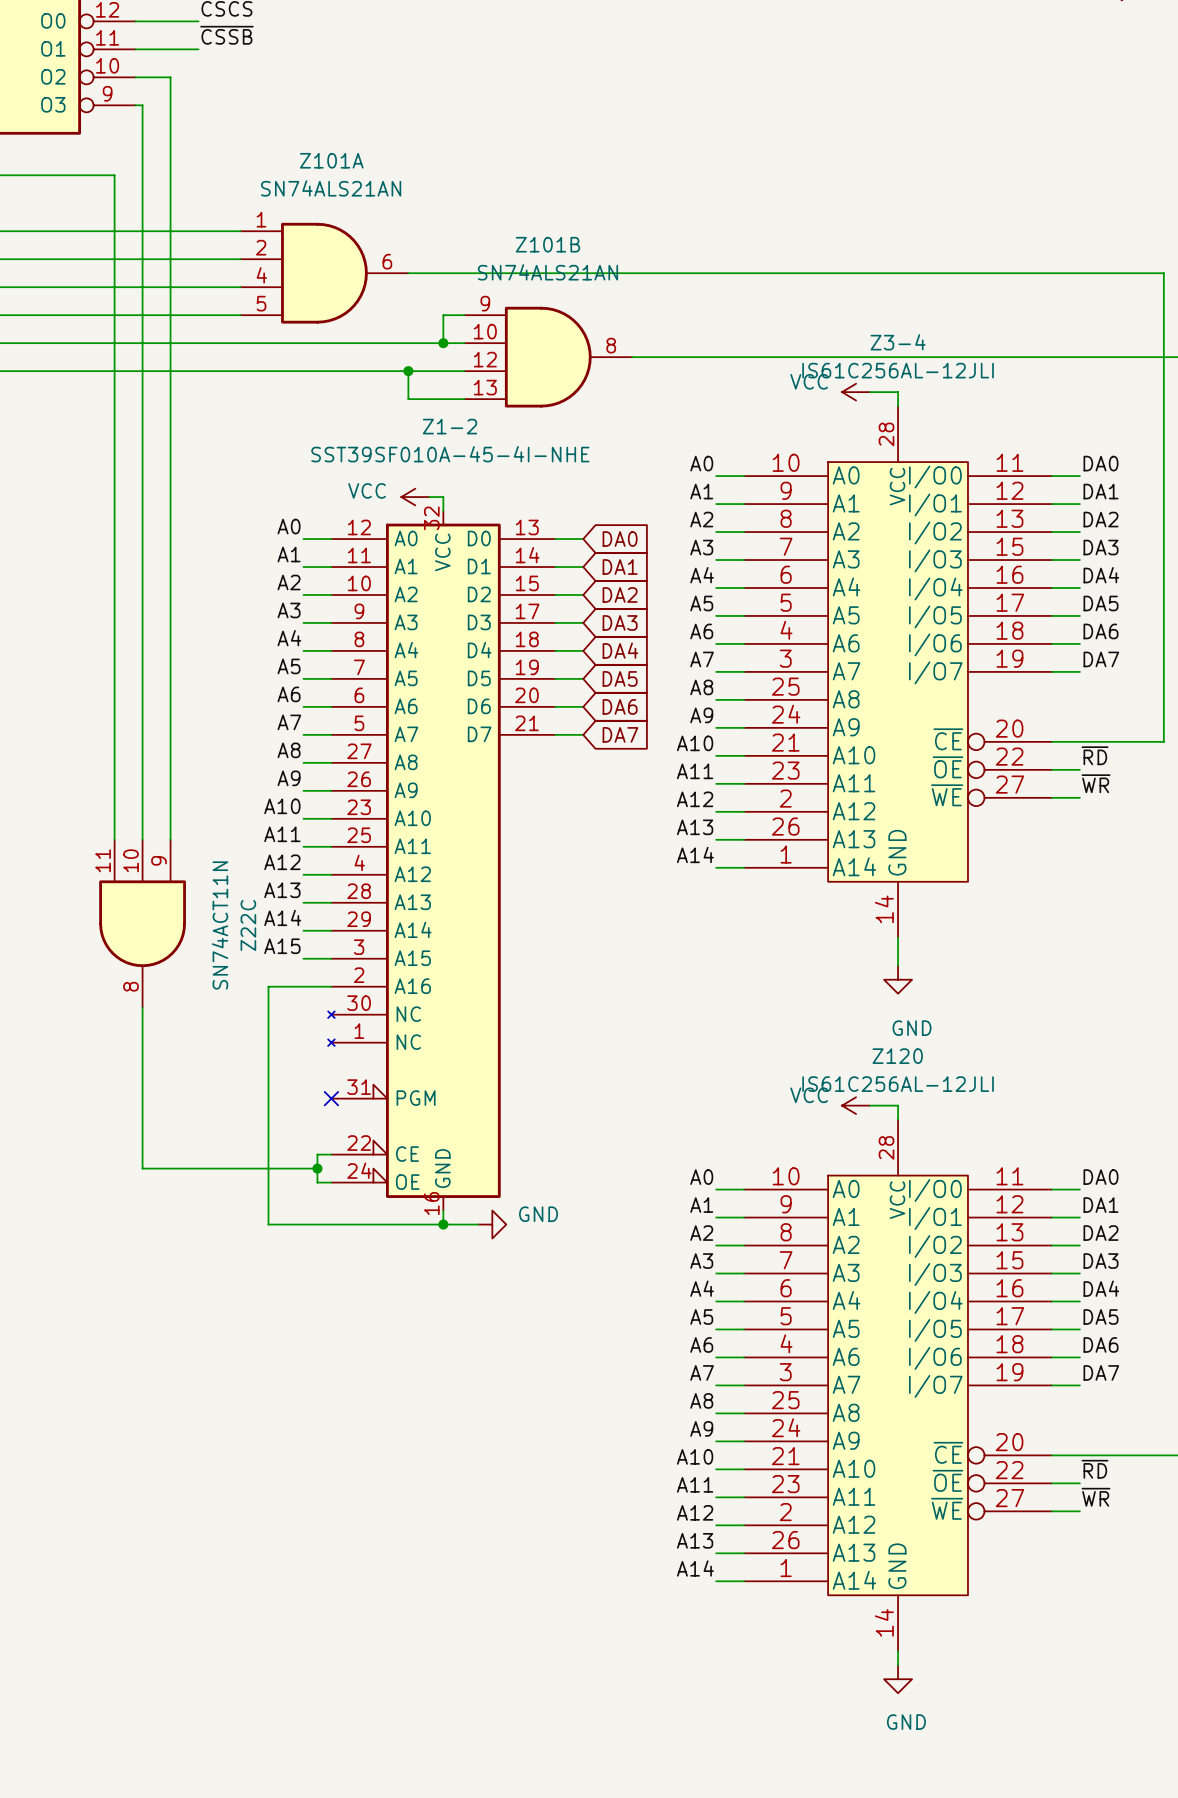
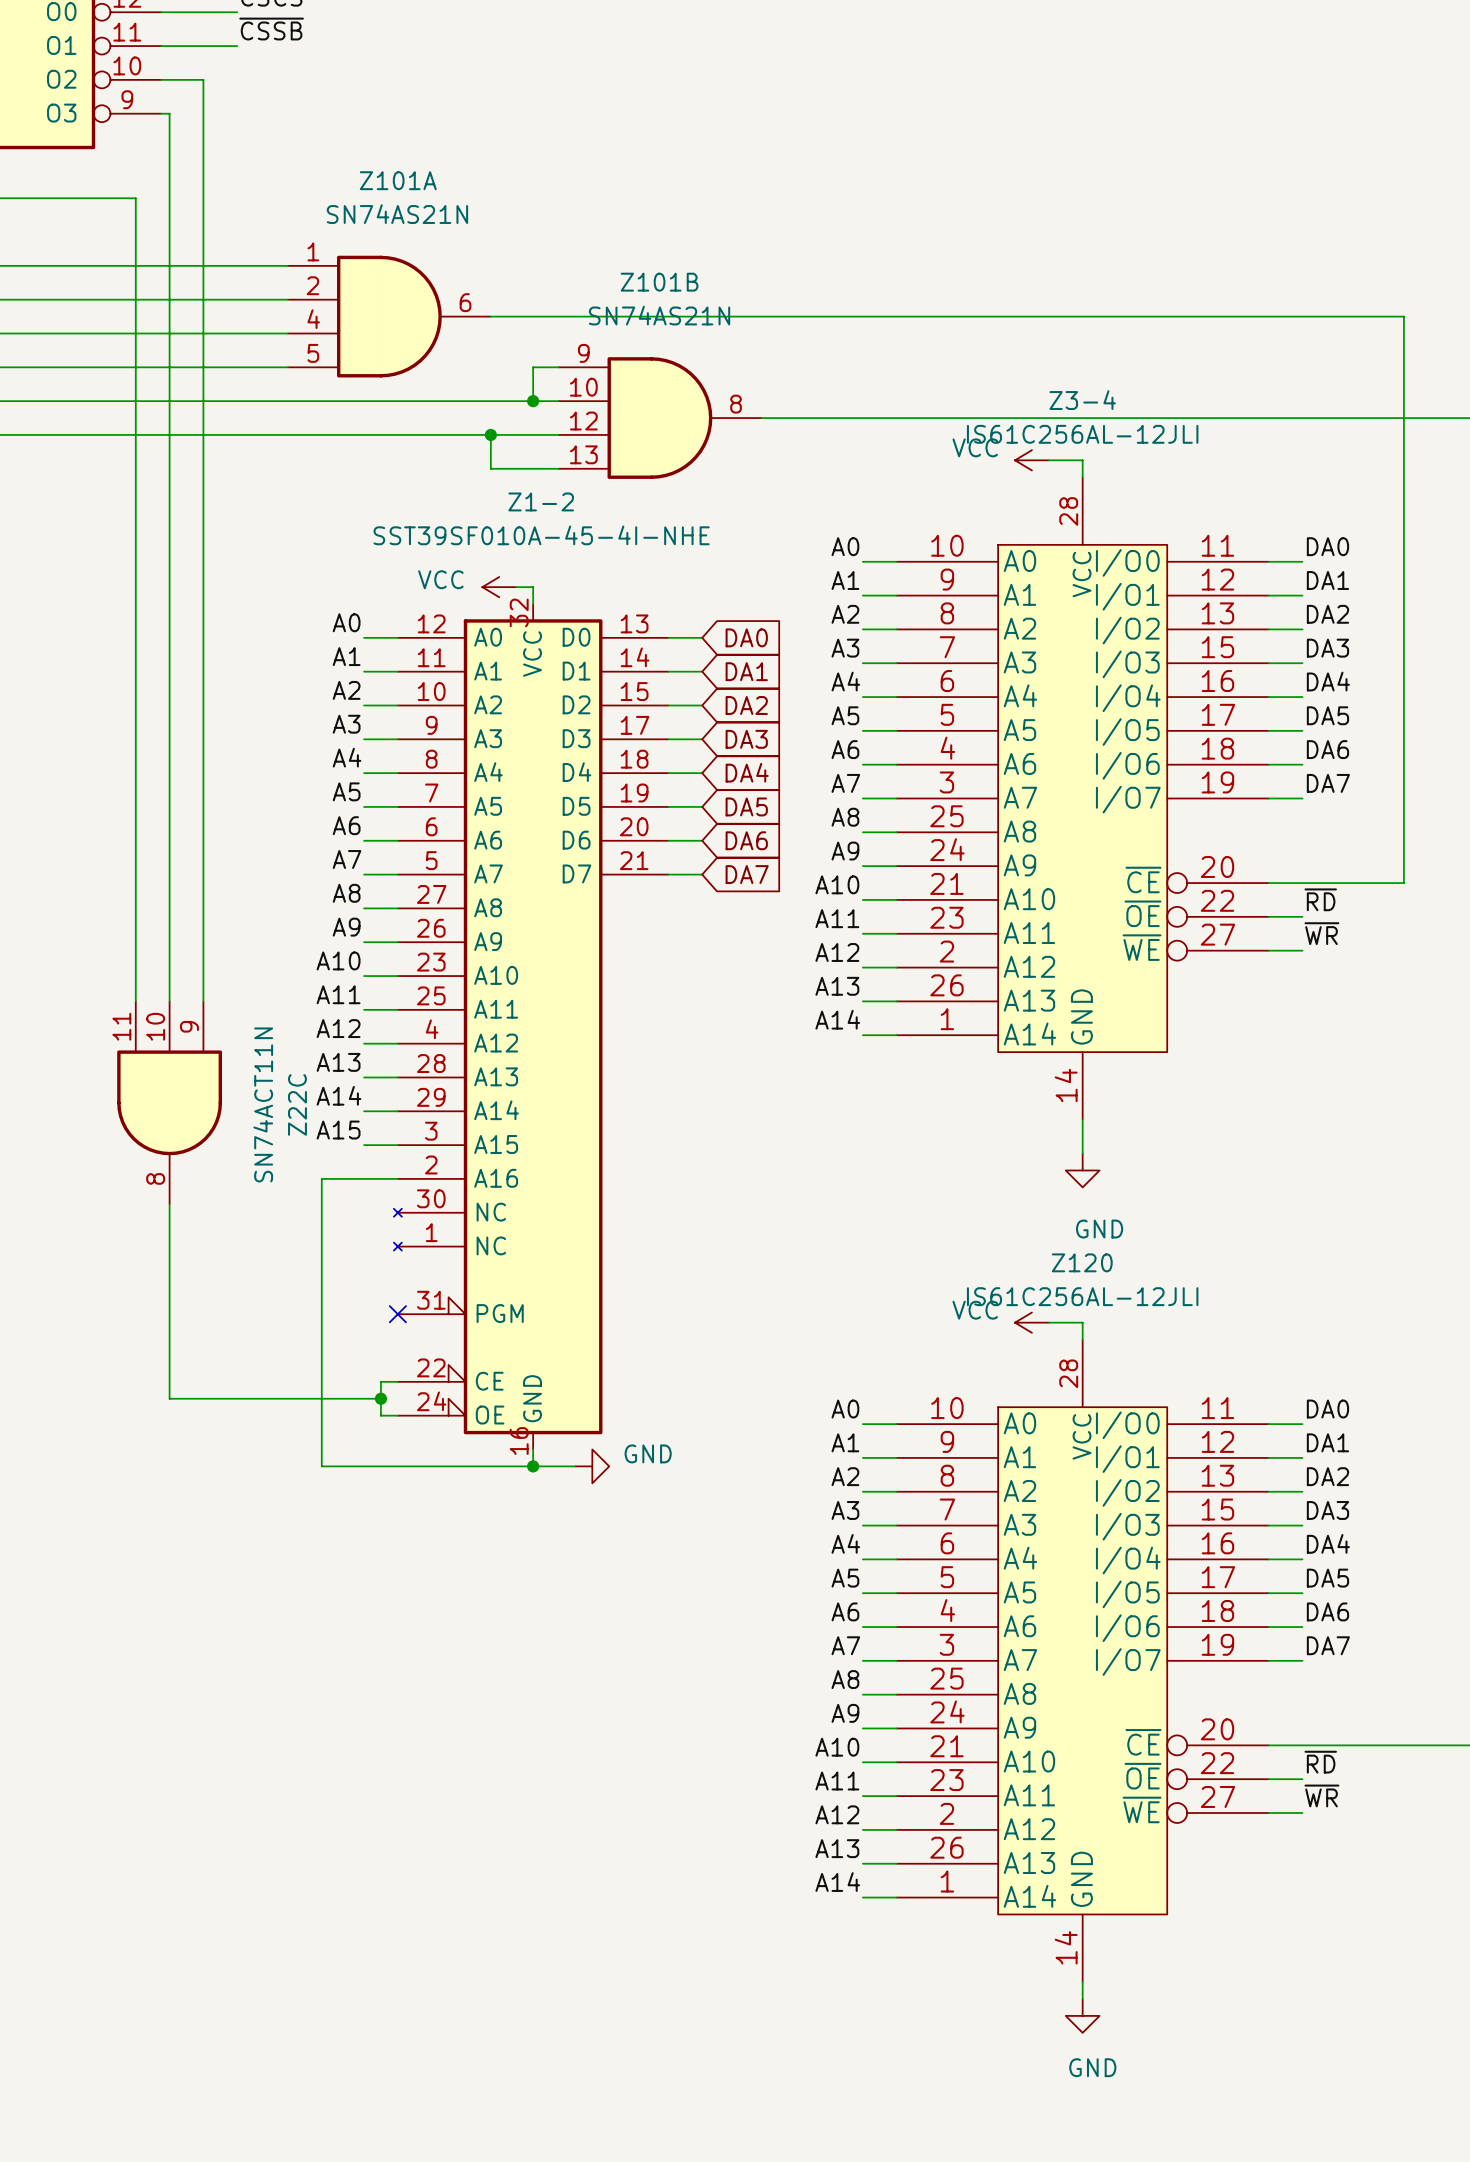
Z101A value: SN74ALS21AN (331, 188) -> SN74AS21N (397, 214)
Z101B value: SN74ALS21AN (547, 272) -> SN74AS21N (659, 315)

